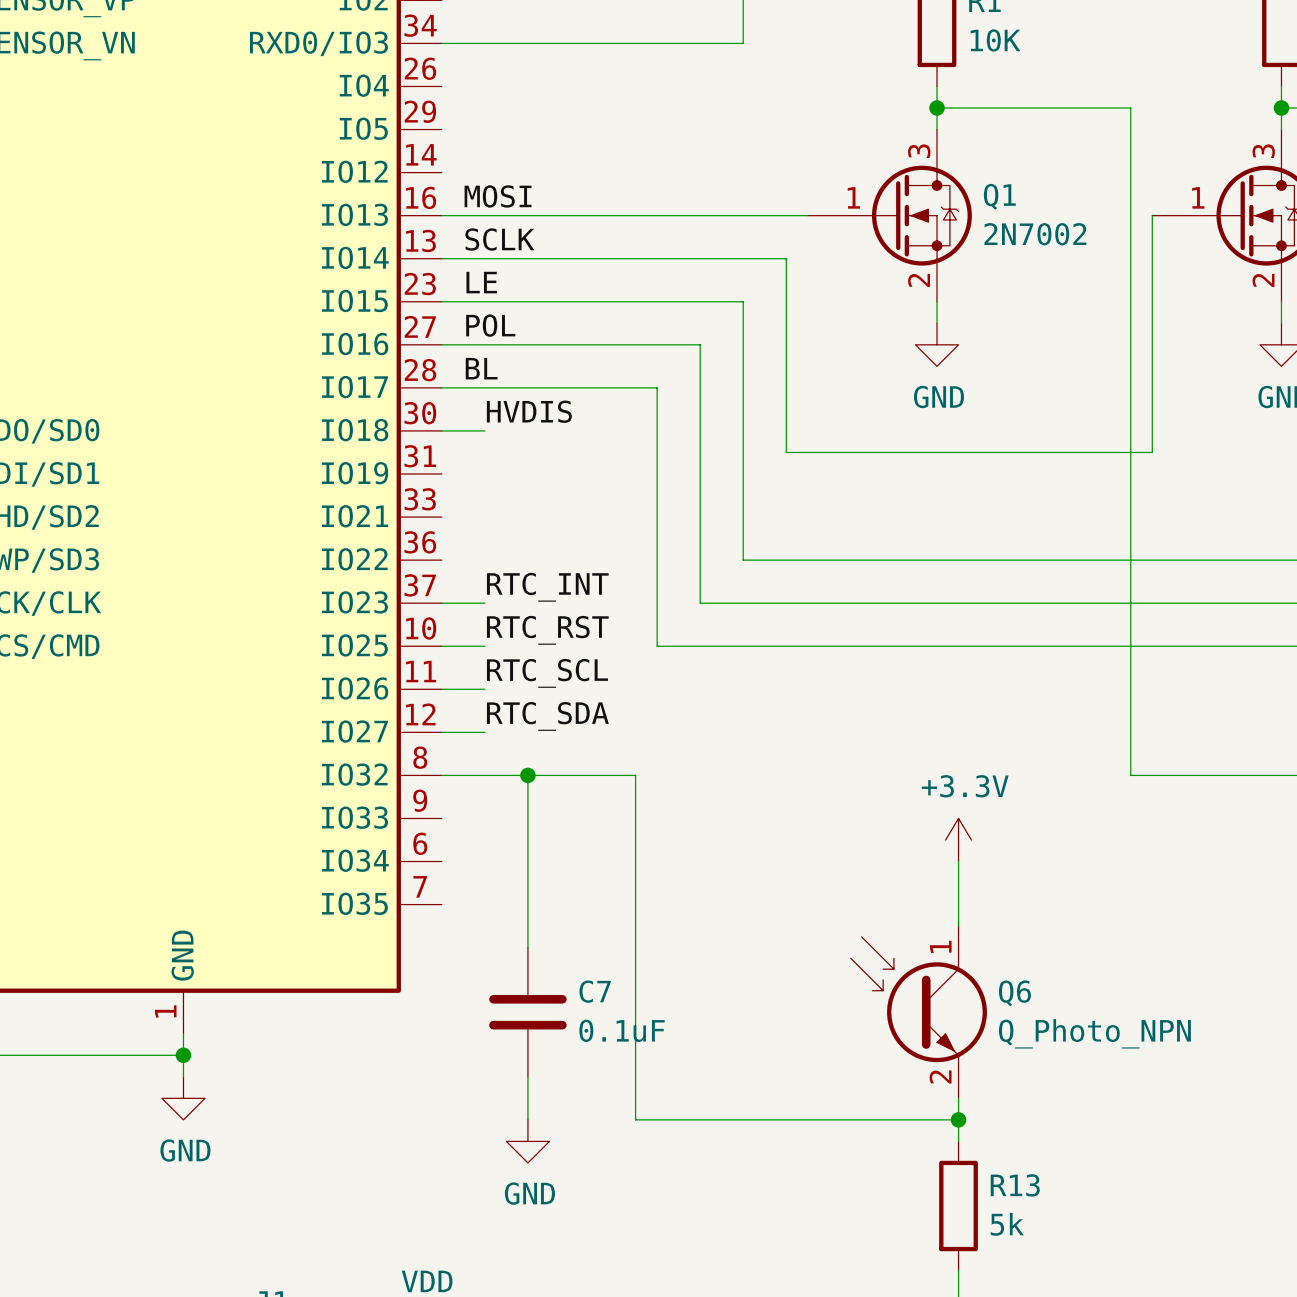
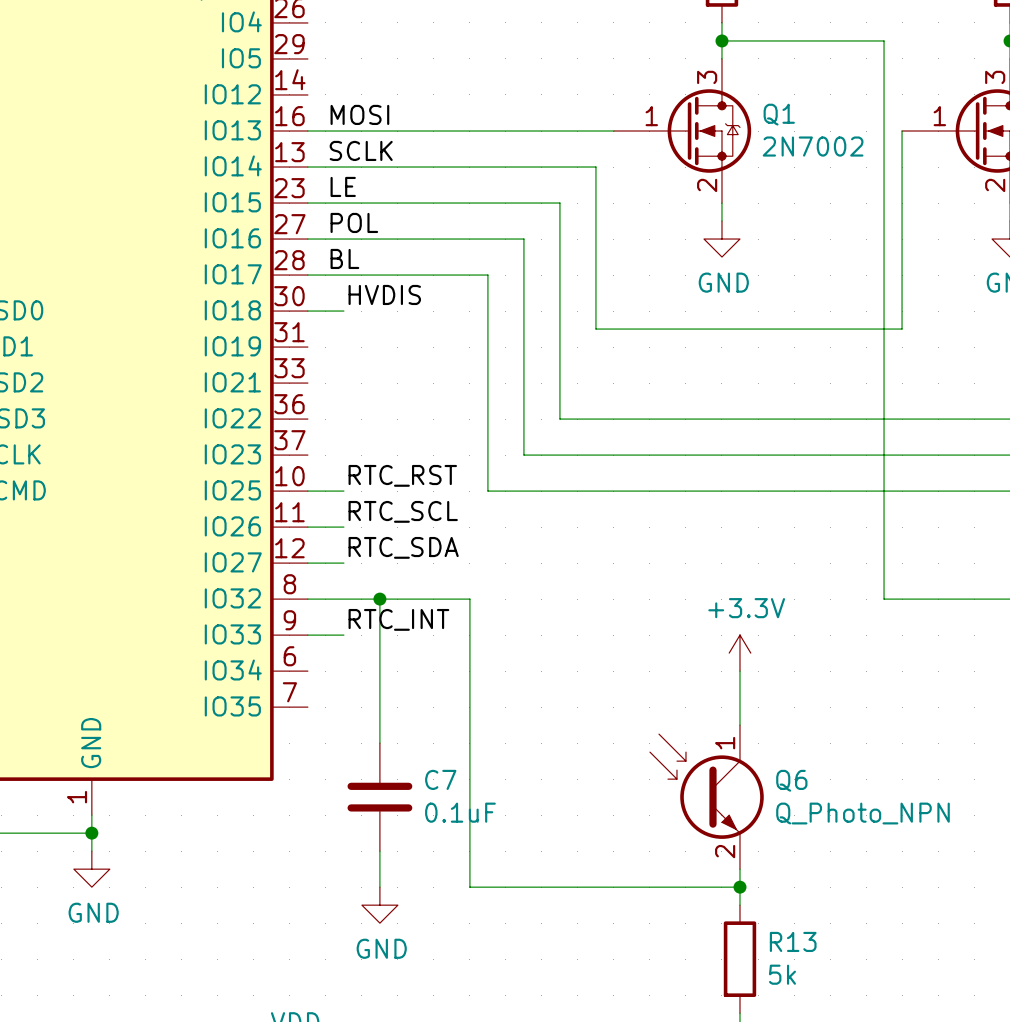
label position: RTC_INT (547, 587) -> RTC_INT (398, 619)
wire: (441, 603) (484, 603) -> (307, 635) (343, 635)

